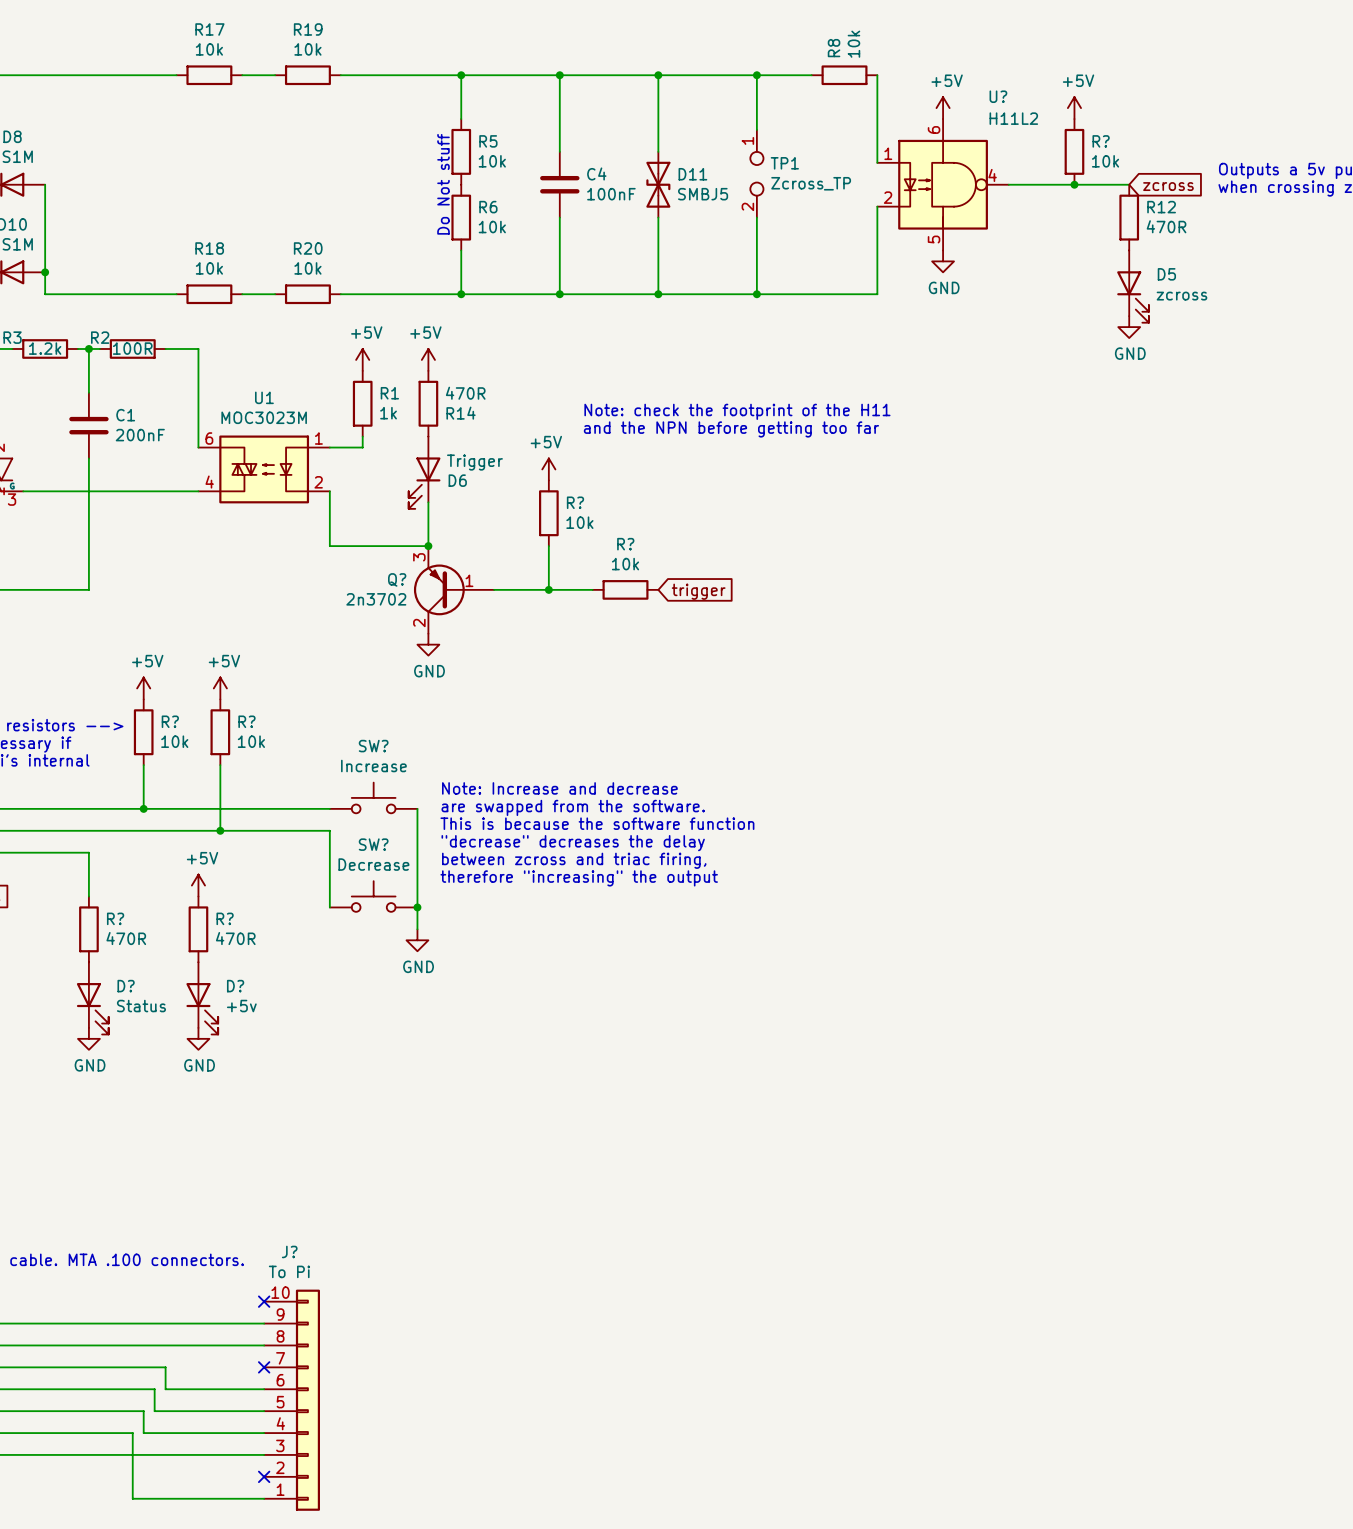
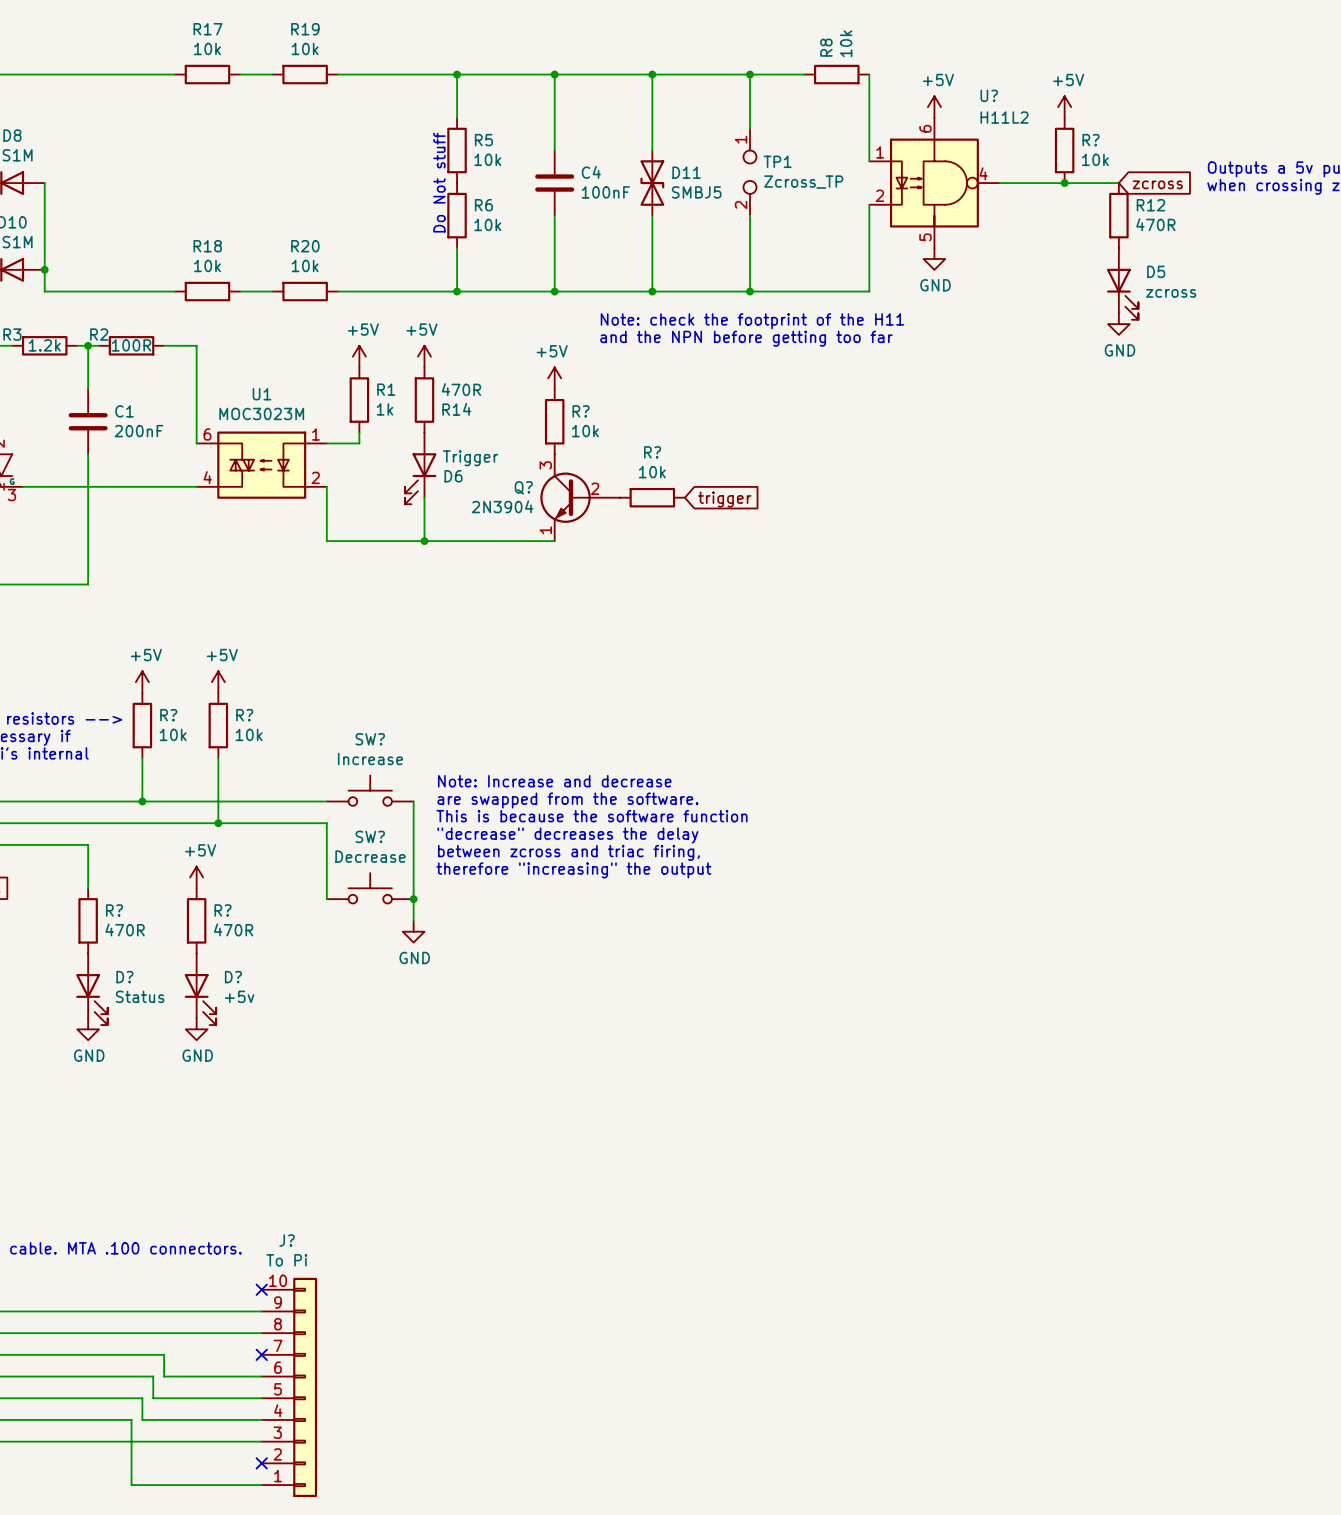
text position: Note: check the footprint of the H11 (737, 411) -> Note: check the footprint of the H11 (752, 321)
R?: none -> 10k (554, 421)
text position: and the NPN before getting too far (731, 429) -> and the NPN before getting too far (746, 338)
power symbol position: +5V (548, 469) -> +5V (554, 378)
Q?: none -> 2N3904 (580, 497)
R?: none -> 10k (652, 497)
R?: 10k (548, 513) -> none
wire: none -> (424, 541) (554, 541)
wire: (548, 546) (548, 589) -> none
Q?: 2n3702 (454, 589) -> none
wire: (494, 589) (592, 589) -> none
junction: (548, 589) -> none
R?: 10k (625, 589) -> none
global label position: trigger (698, 591) -> trigger (724, 499)
power symbol: GND (428, 644) -> none

